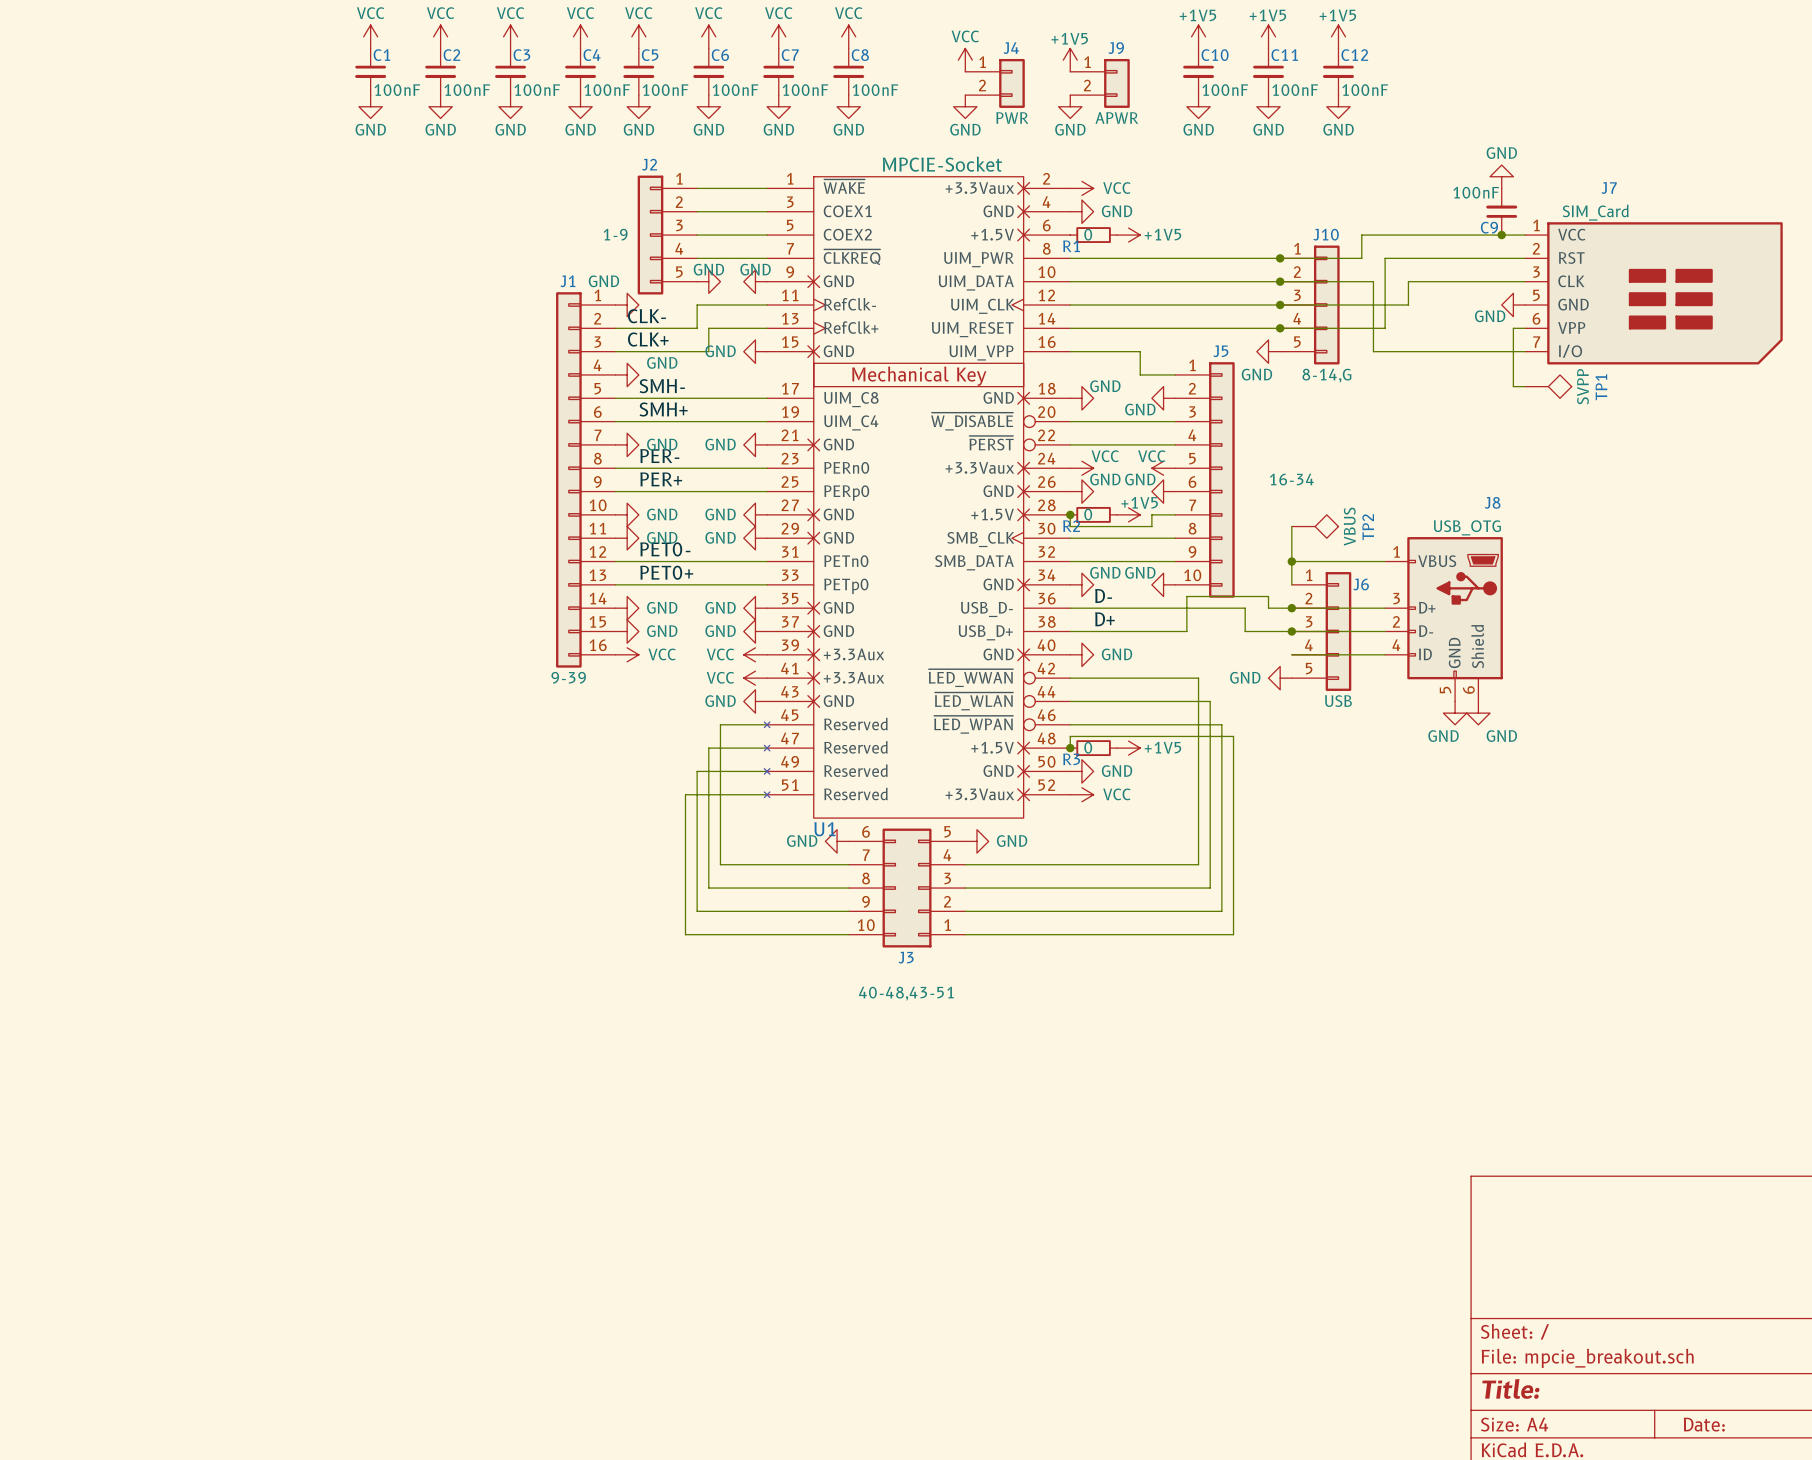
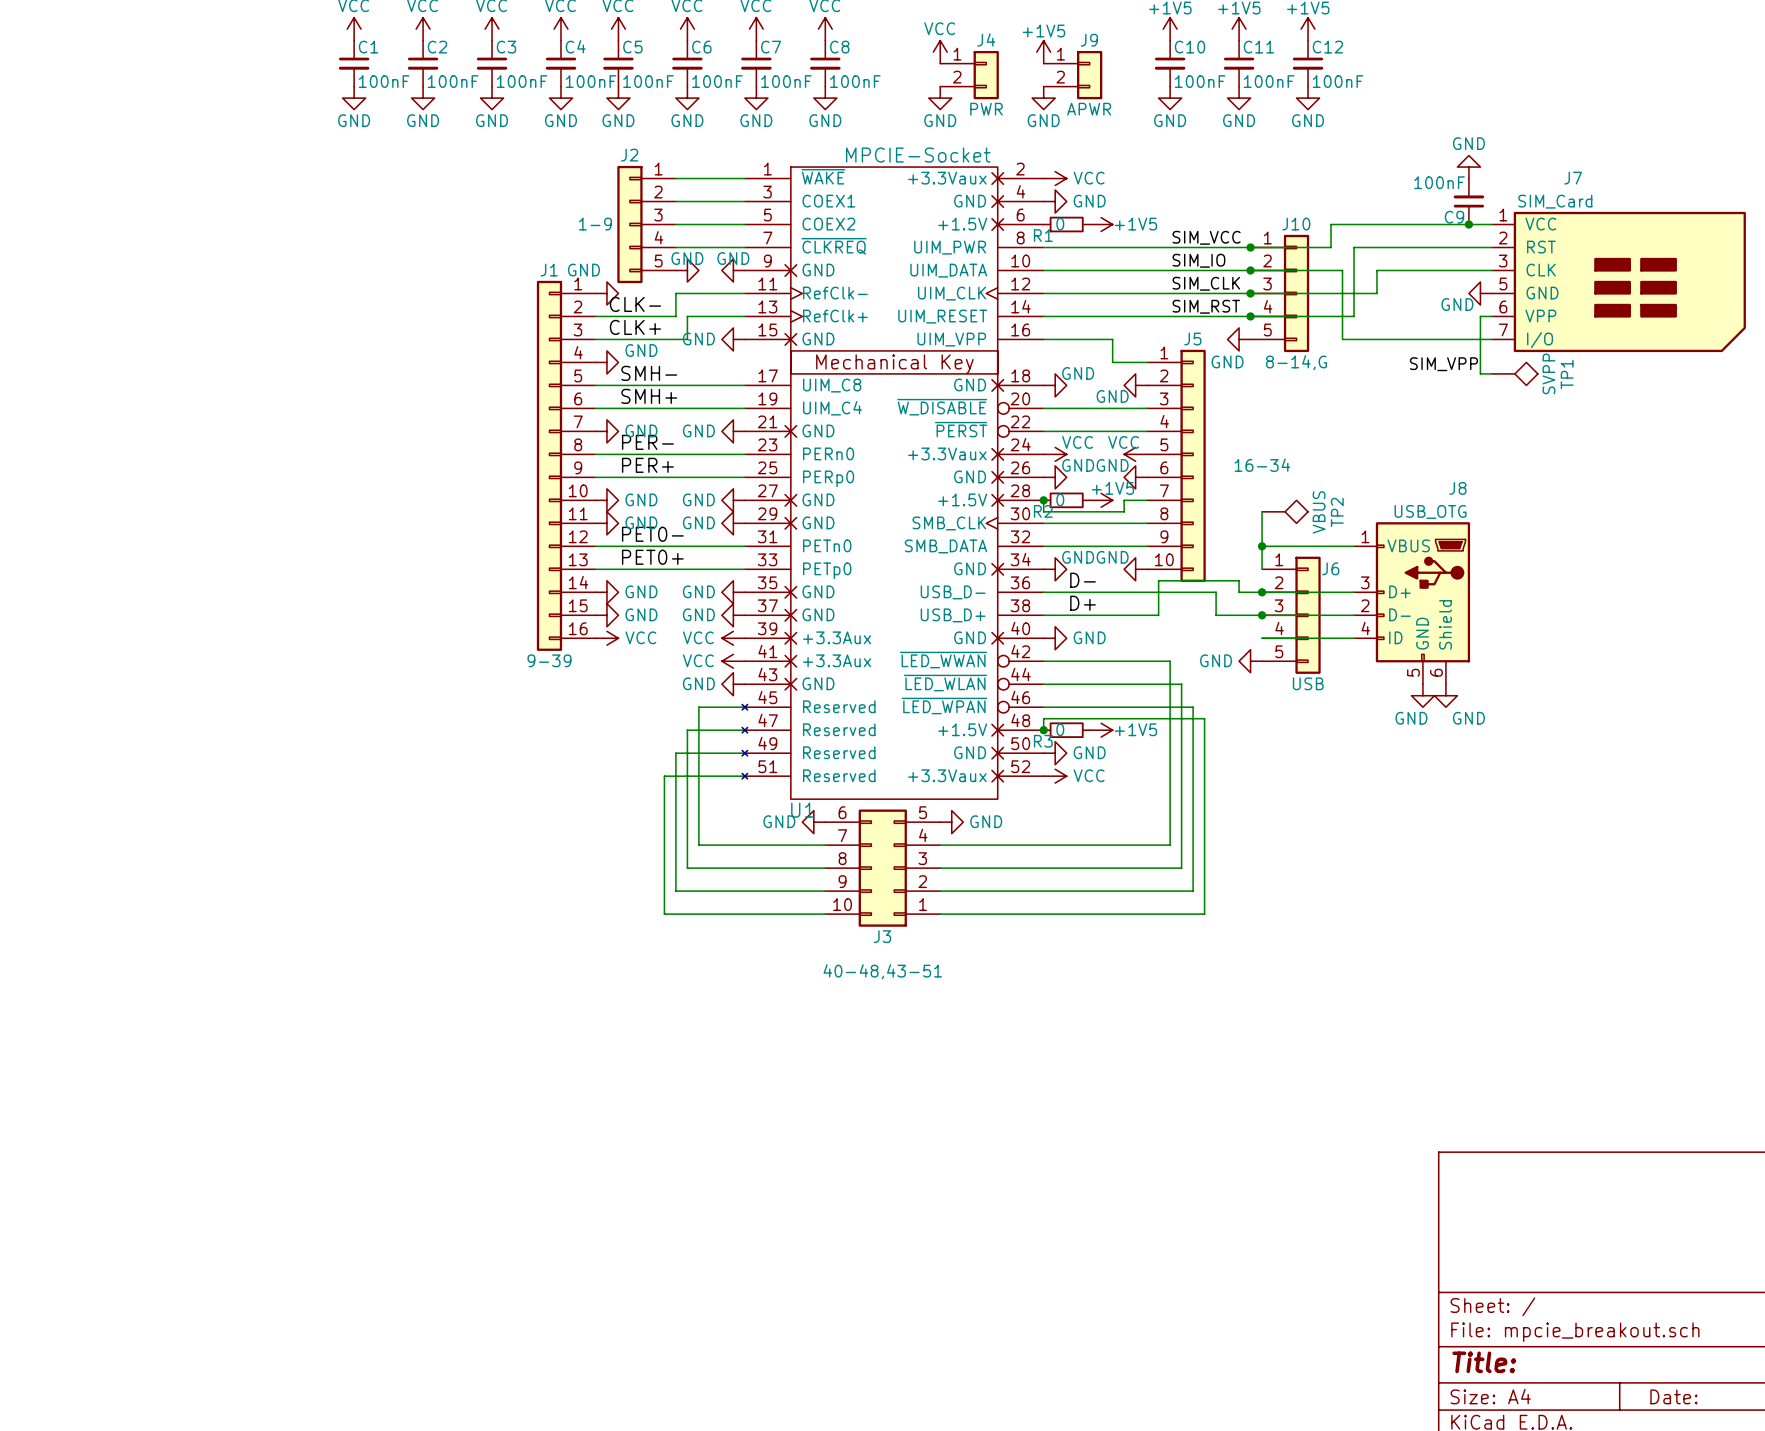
label: none -> SIM_VCC (1206, 237)
label: none -> SIM_IO (1198, 260)
label: none -> SIM_CLK (1206, 283)
label: none -> SIM_RST (1206, 306)
label: none -> SIM_VPP (1443, 364)

